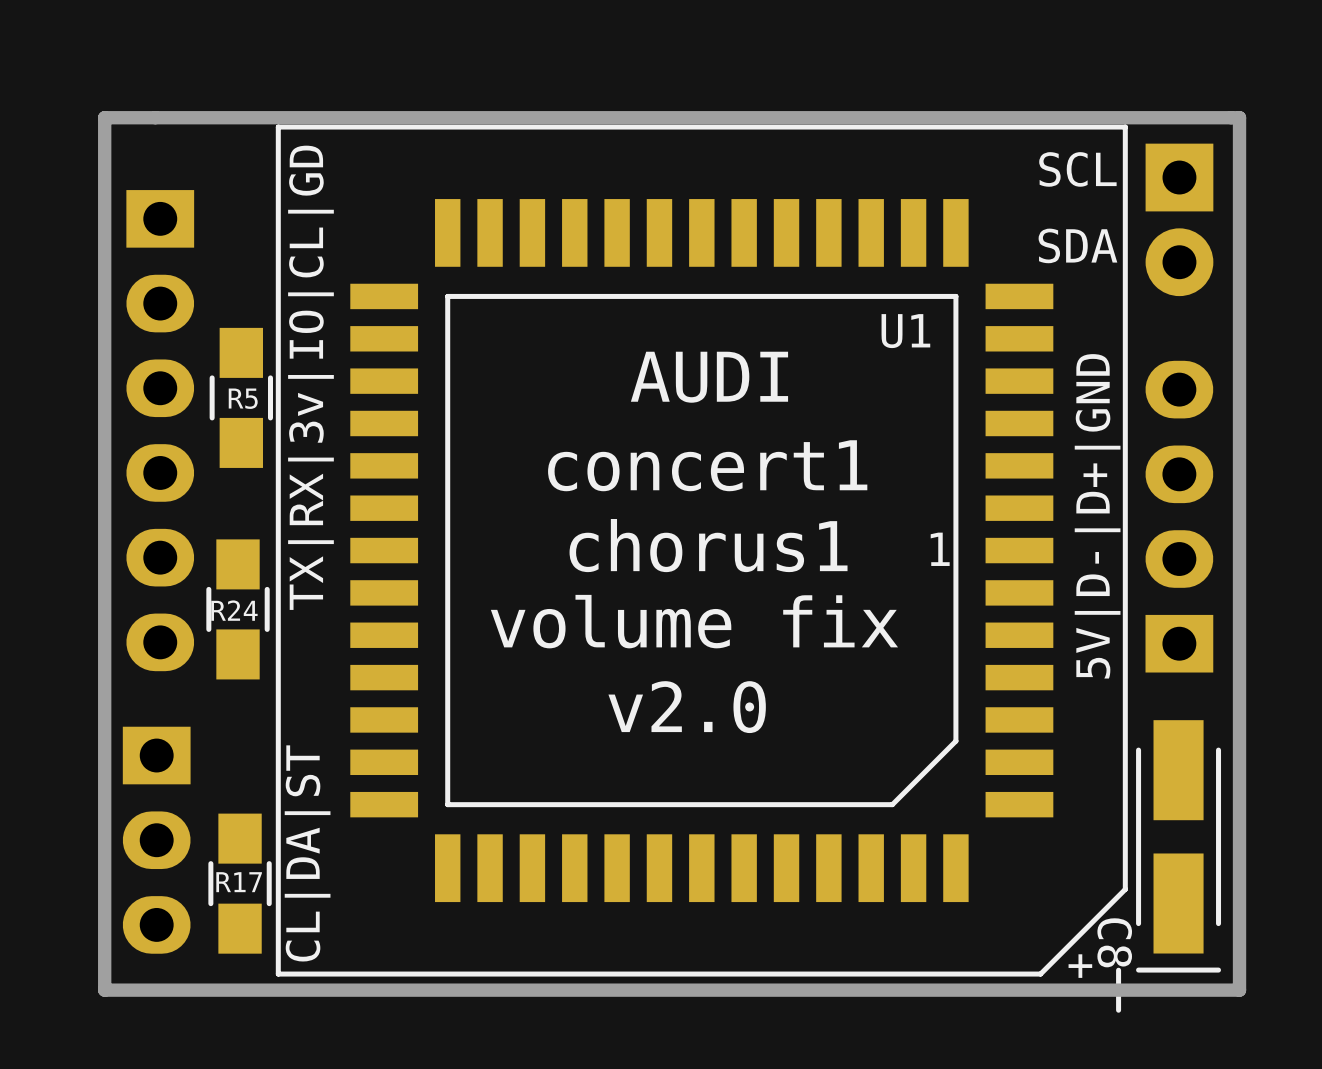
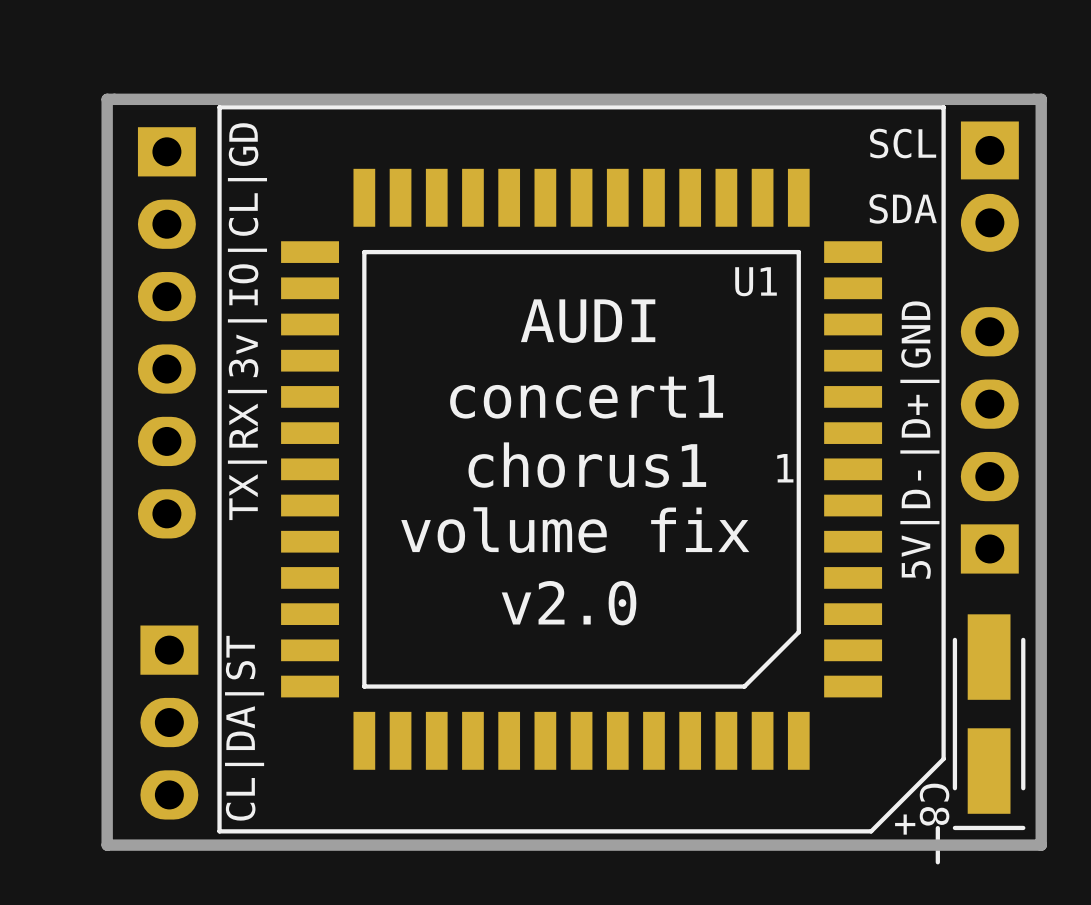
board edge: (146, 117) (104, 117) (104, 990) (146, 990) -> (107, 99) (107, 845)
R5: (241, 397) -> none
part position: (160, 430) -> (166, 332)
R24: (238, 609) -> none
part position: (156, 840) -> (169, 722)
R17: (240, 883) -> none

